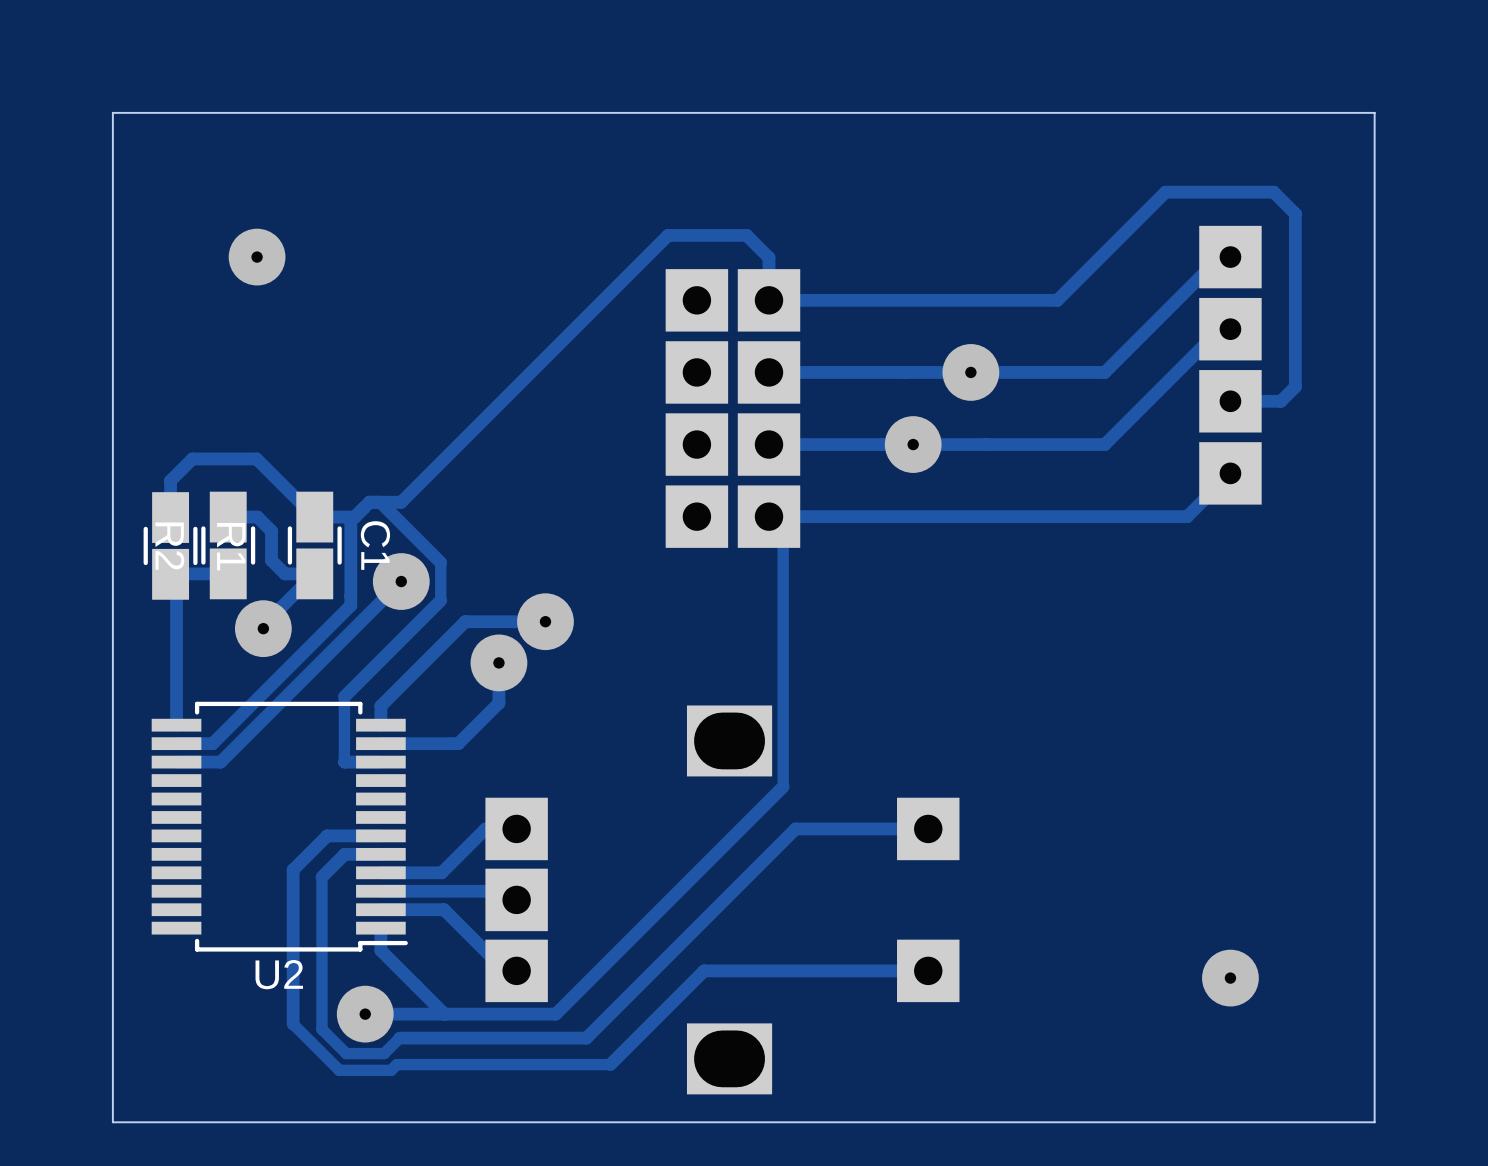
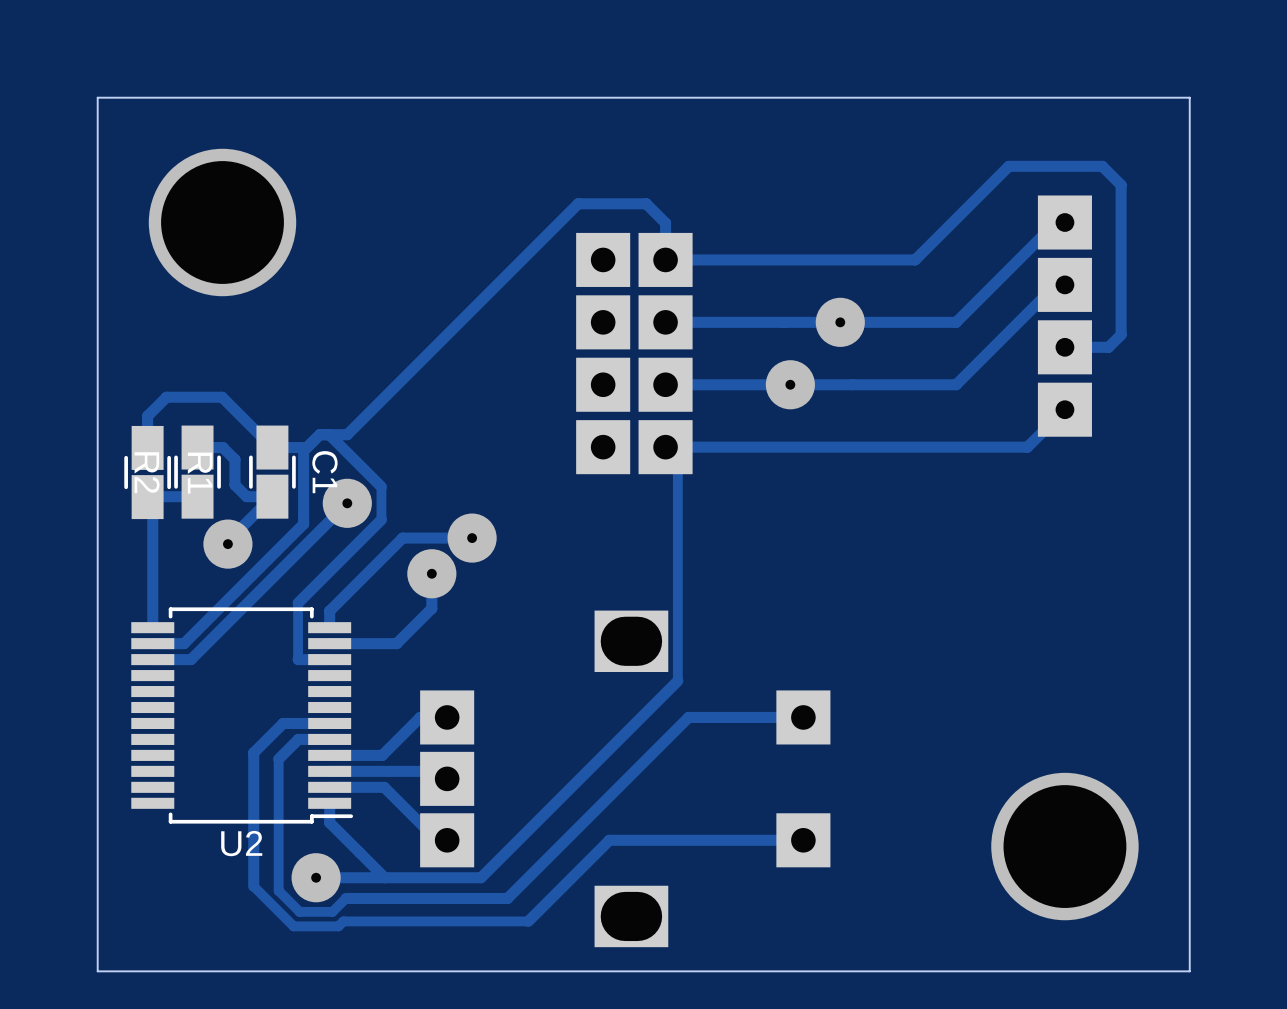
via size: [228, 228, 286, 286] -> [148, 148, 297, 297]
via size: [1202, 949, 1259, 1007] -> [991, 772, 1139, 921]

